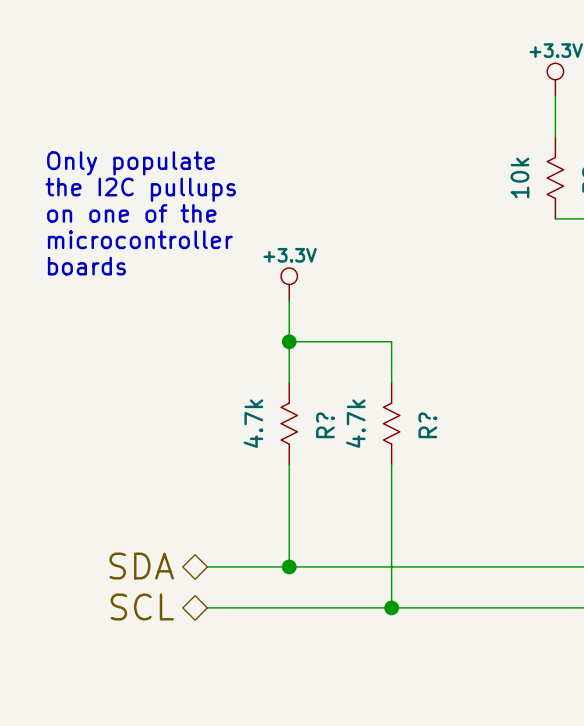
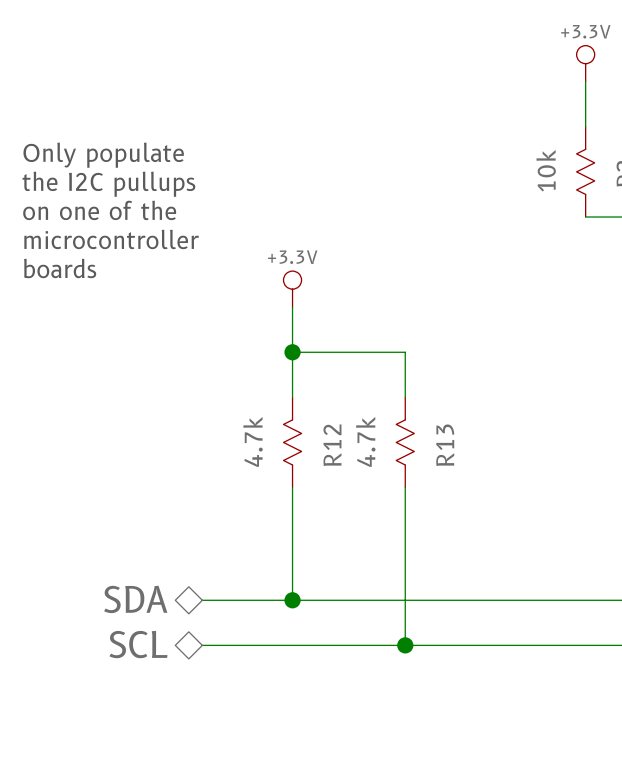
R? name: R? (325, 425) -> R12 (332, 445)
R? name: R? (427, 425) -> R13 (445, 445)

